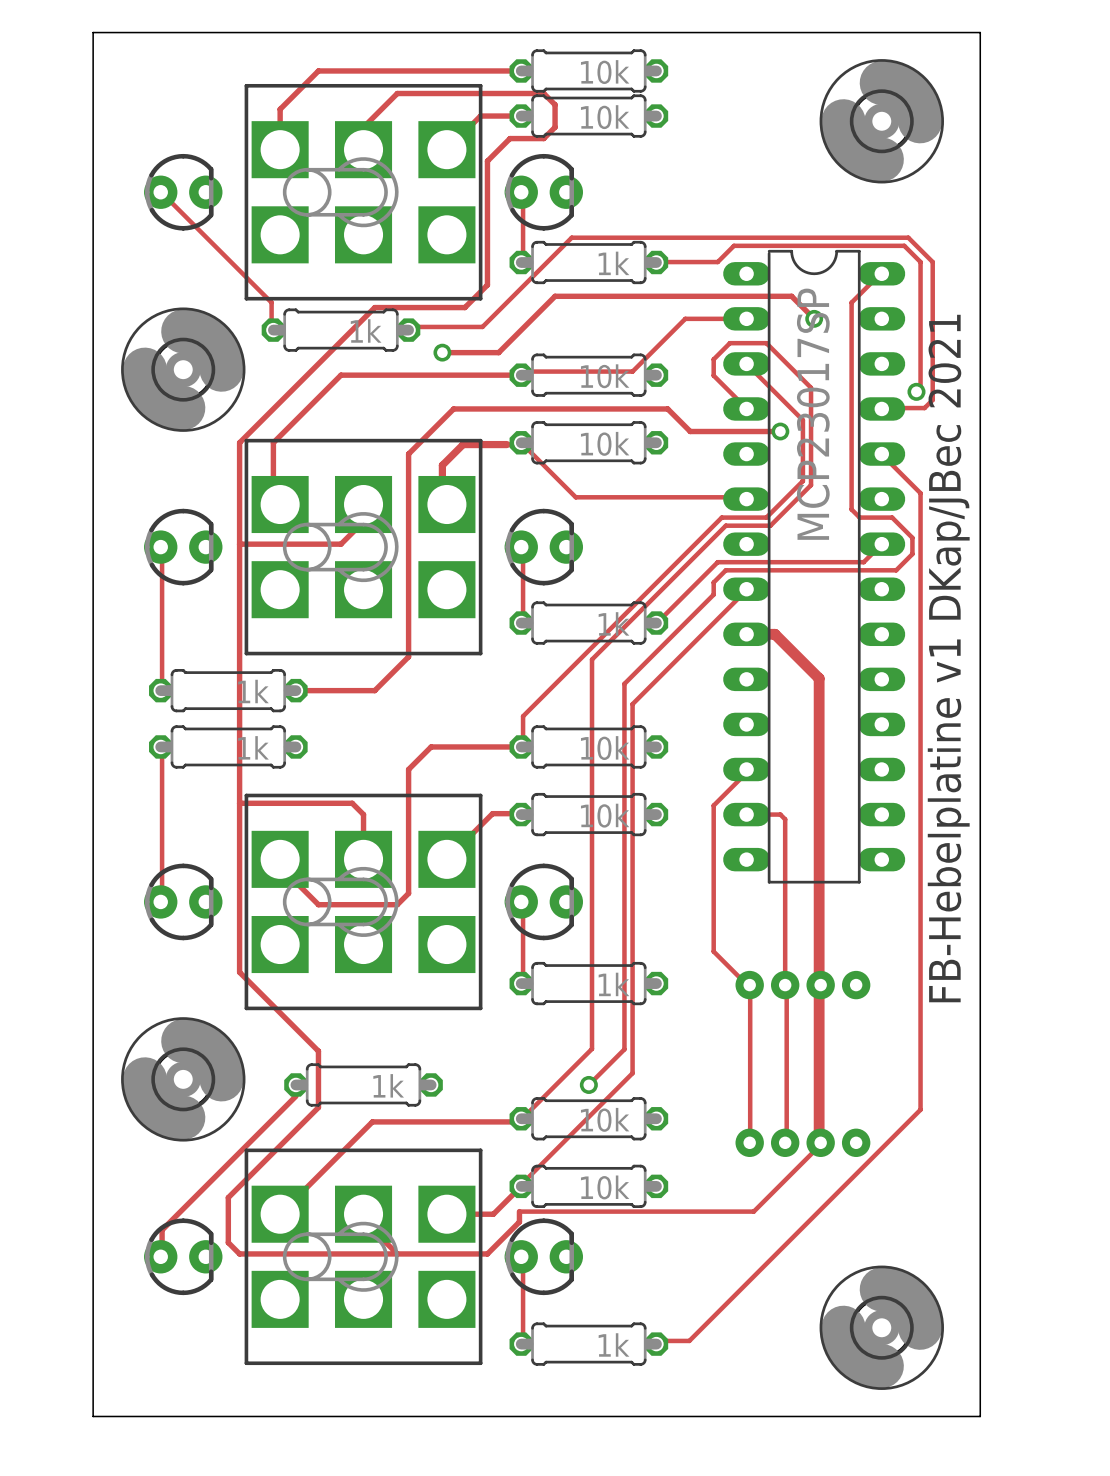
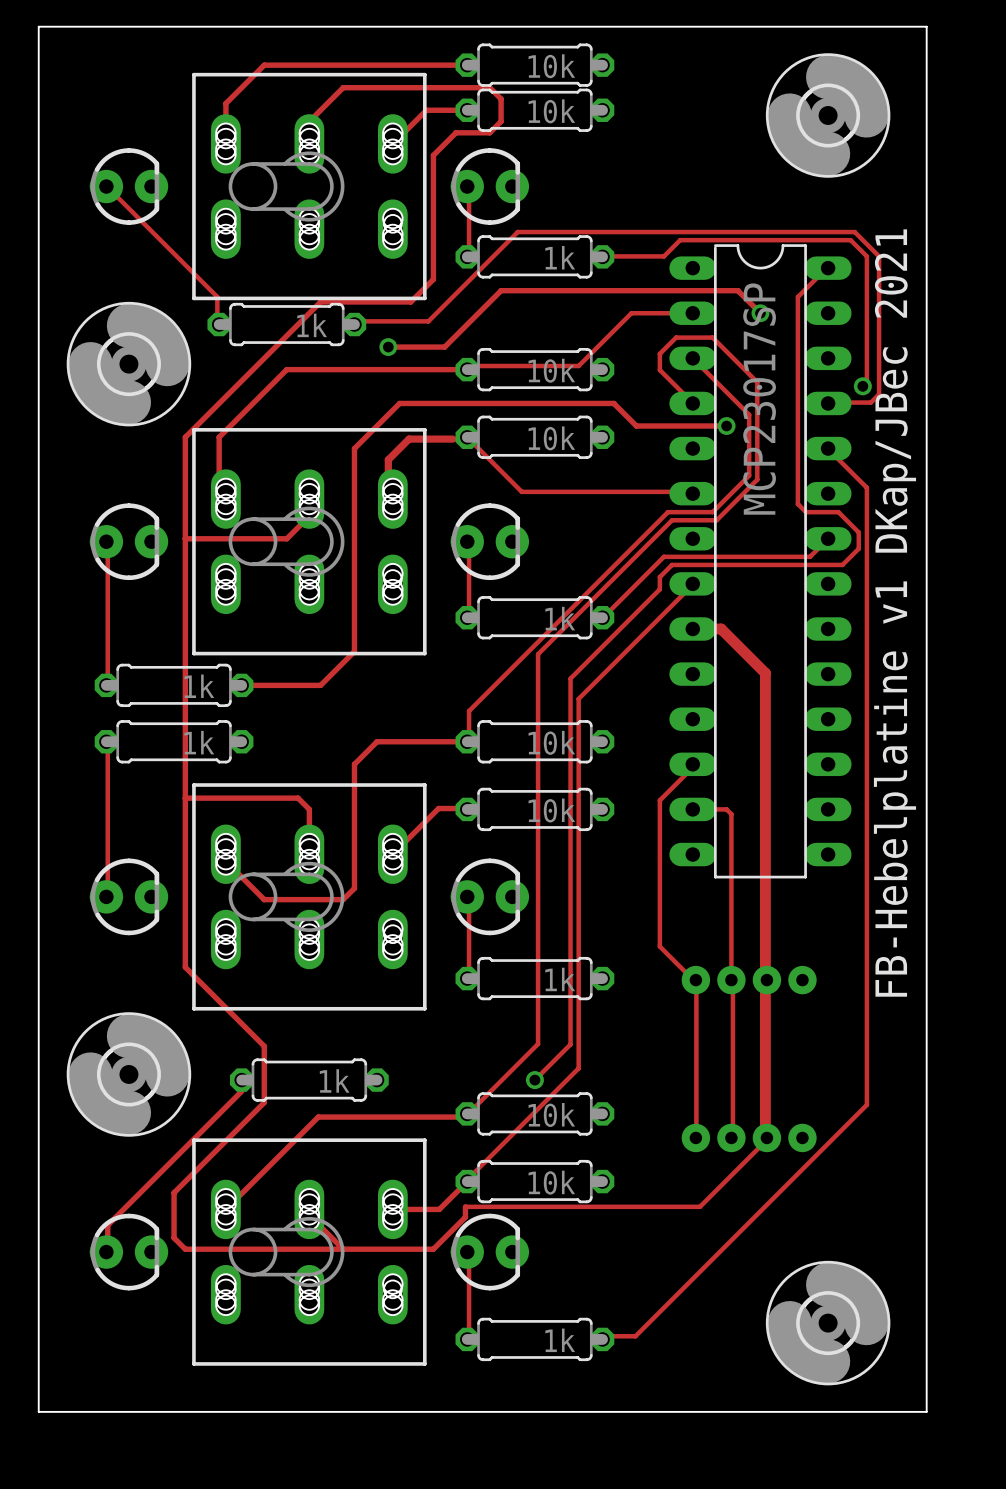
part footprint: [244, 83, 483, 301] -> [192, 72, 427, 301]
part footprint: [244, 438, 483, 656] -> [192, 428, 427, 656]
part footprint: [244, 793, 483, 1011] -> [192, 783, 427, 1011]
part footprint: [244, 1148, 483, 1366] -> [192, 1138, 427, 1366]

